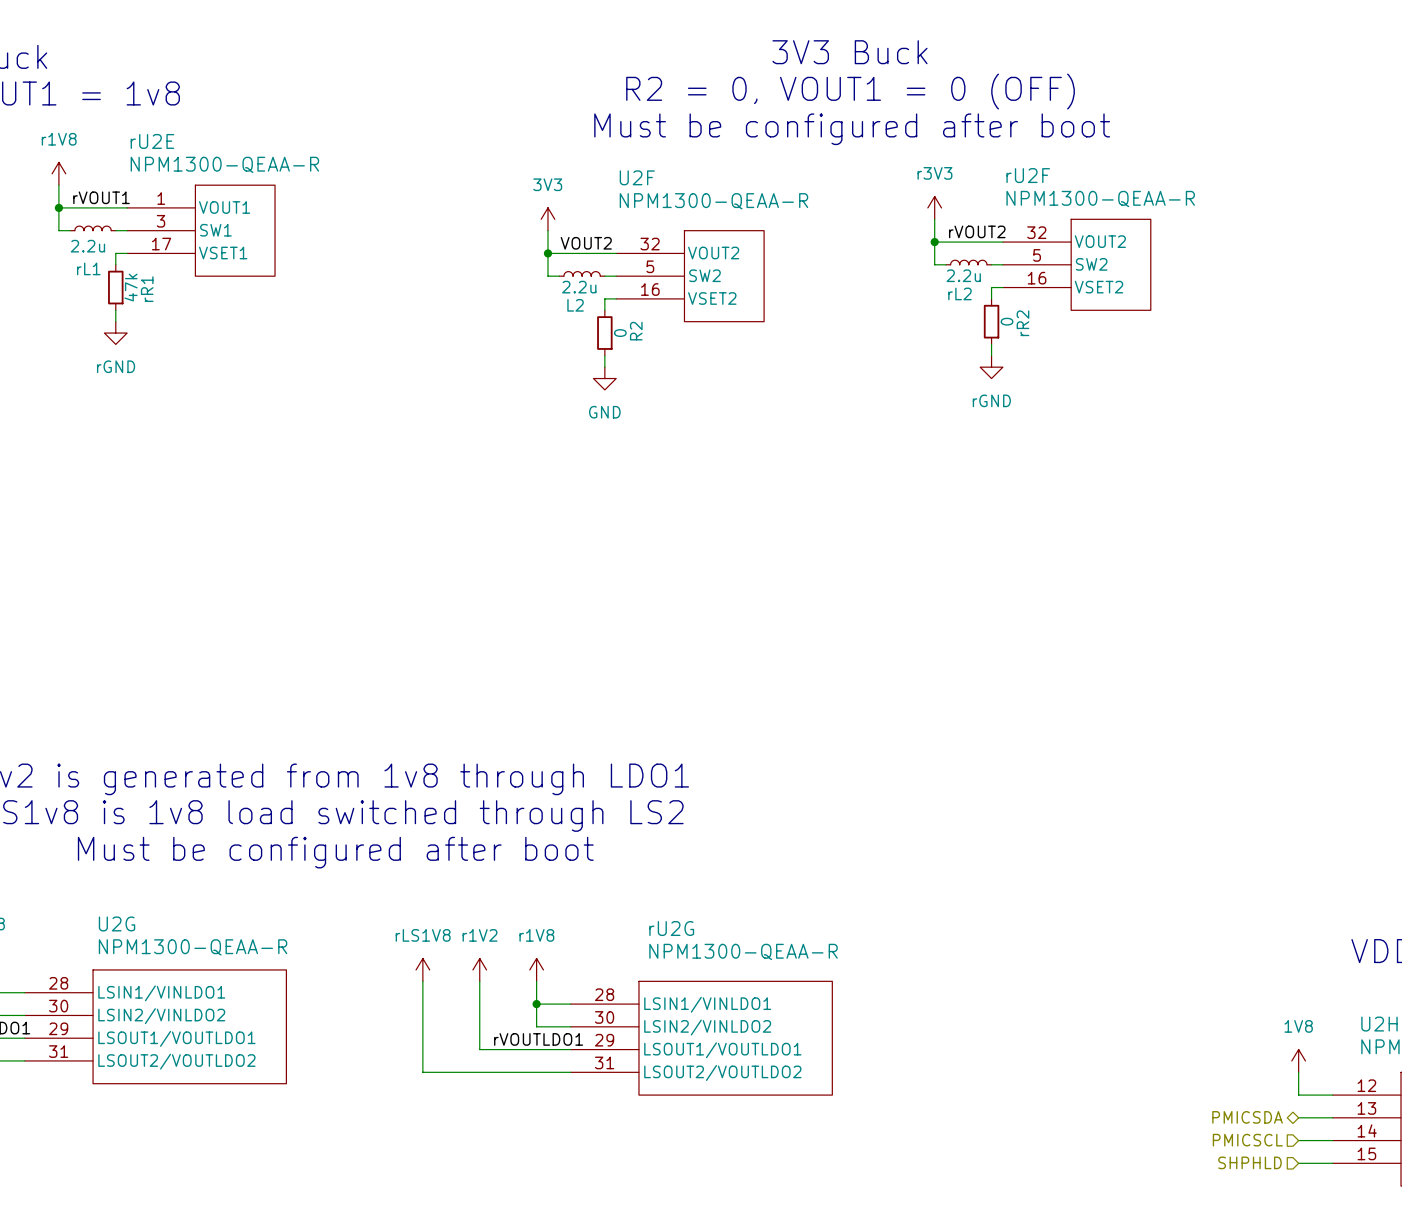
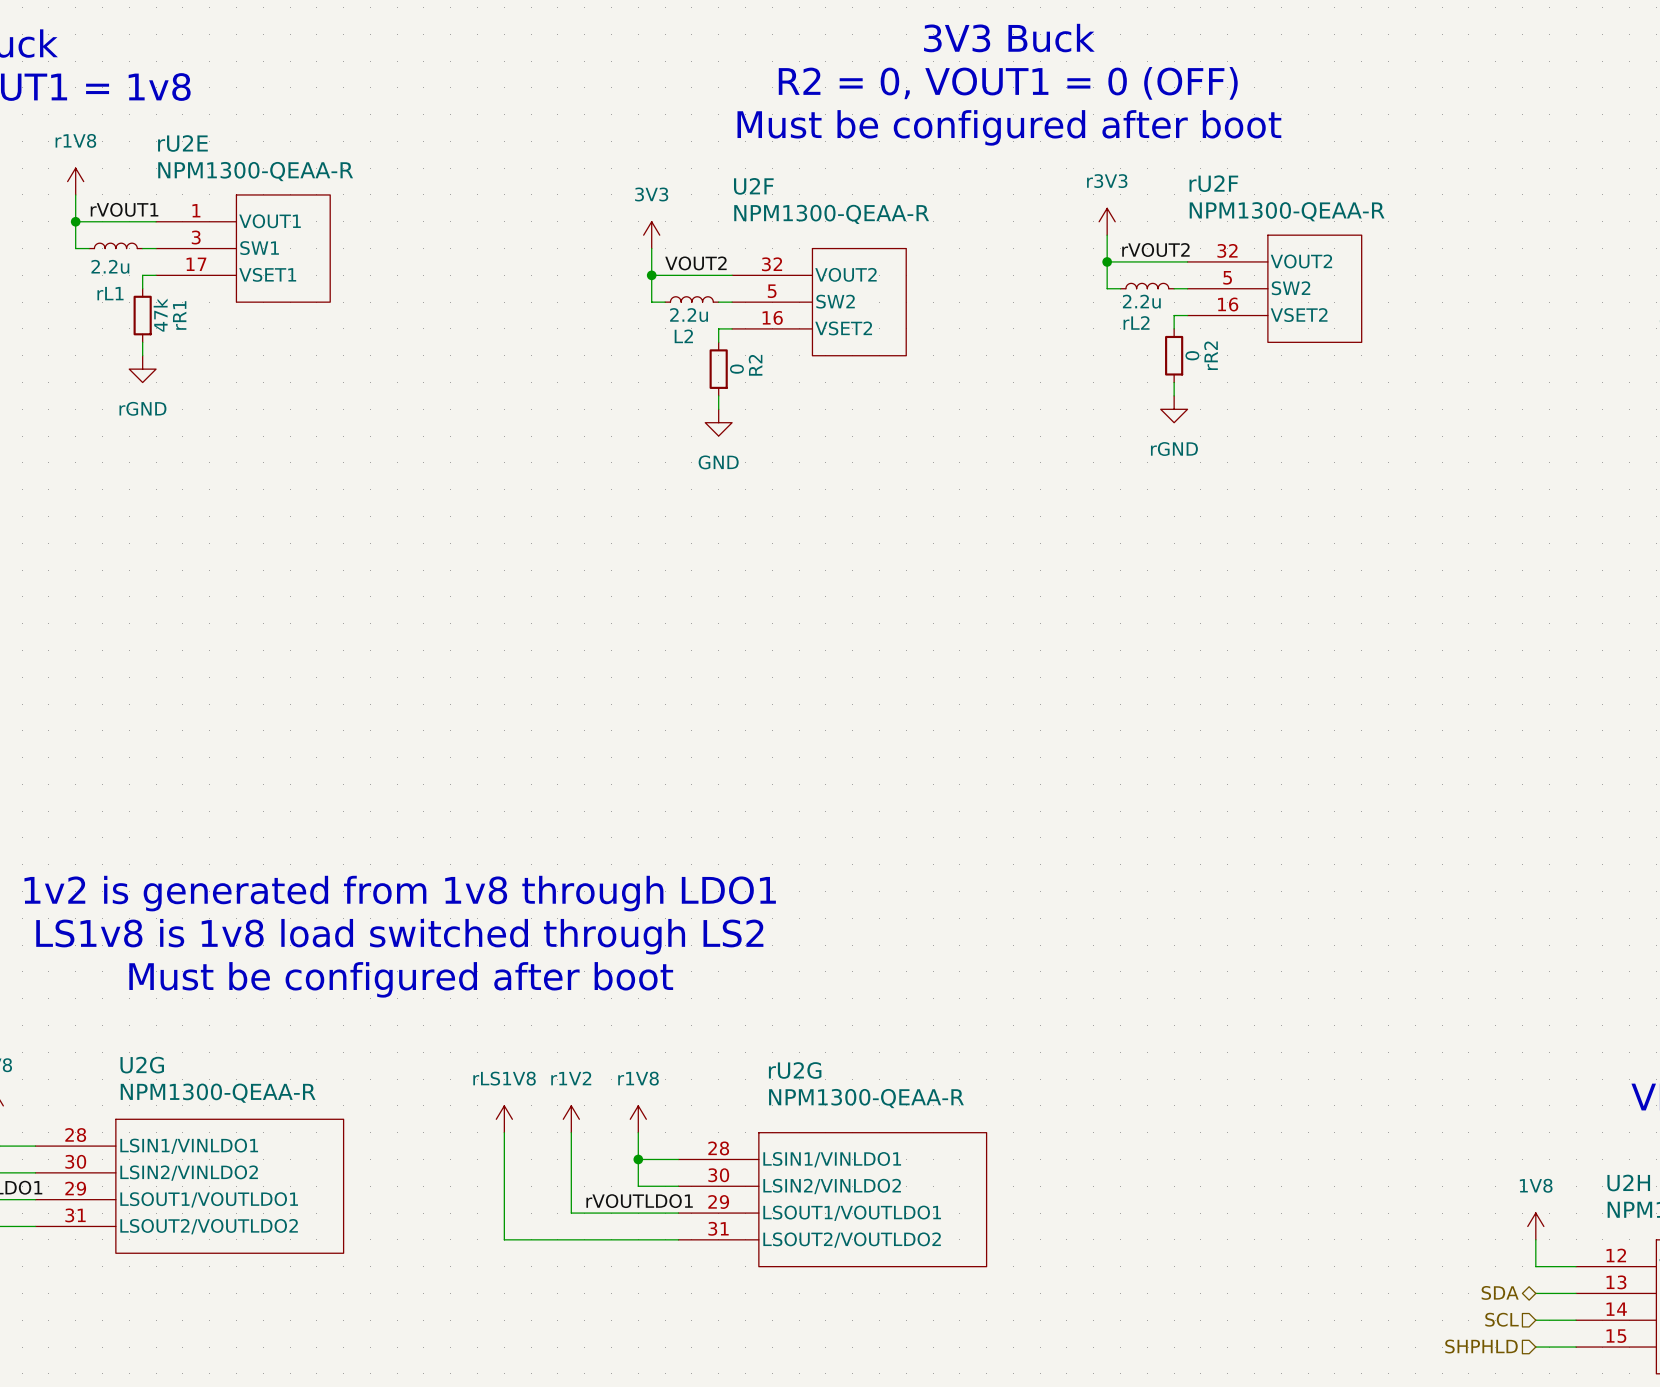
hierarchical label: PMICSDA (1247, 1117) -> SDA (1500, 1292)
hierarchical label: PMICSCL (1247, 1140) -> SCL (1502, 1319)

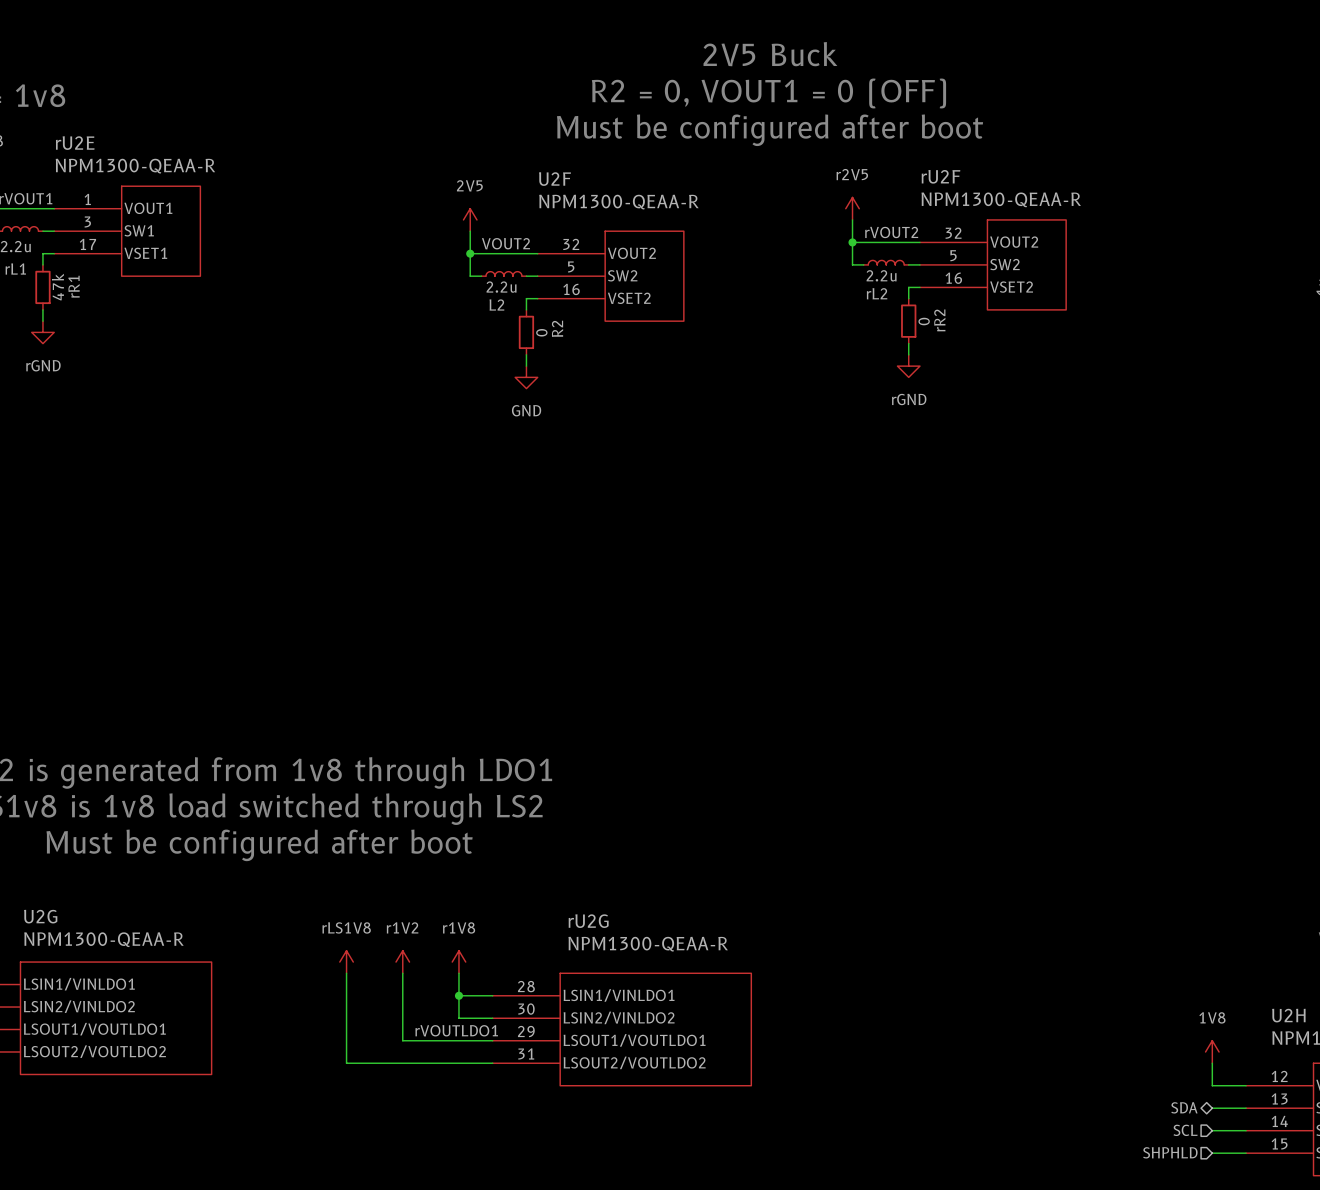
text: 3V3 Buck (1009, 38) -> 2V5 Buck (770, 54)
power symbol: r3V3 (1107, 221) -> r2V5 (852, 208)
power symbol: 3V3 (651, 235) -> 2V5 (470, 219)

